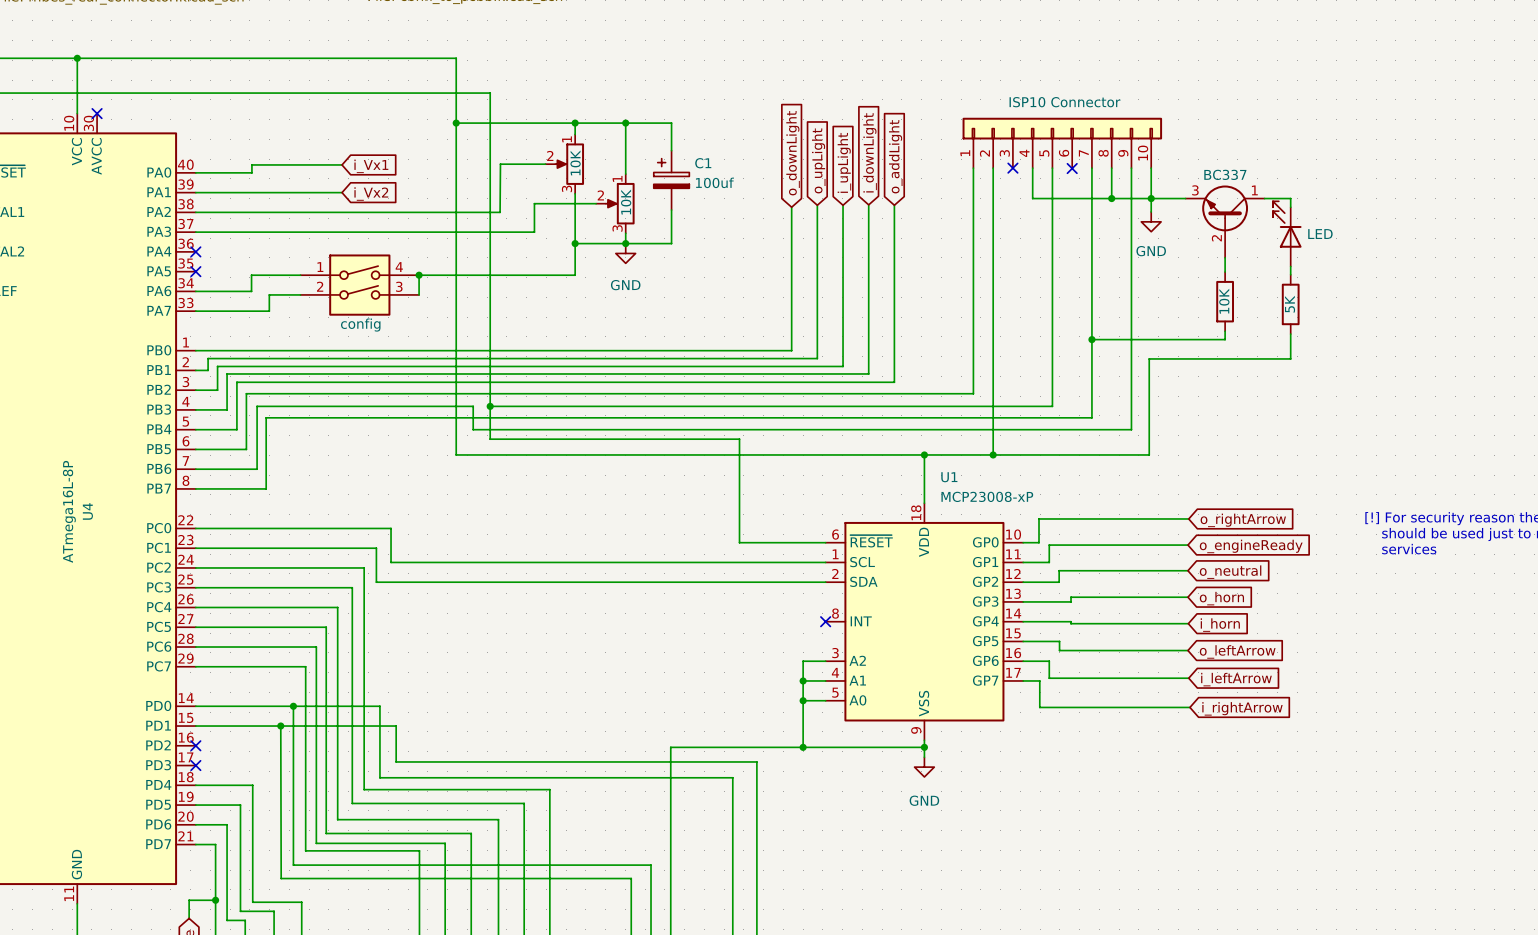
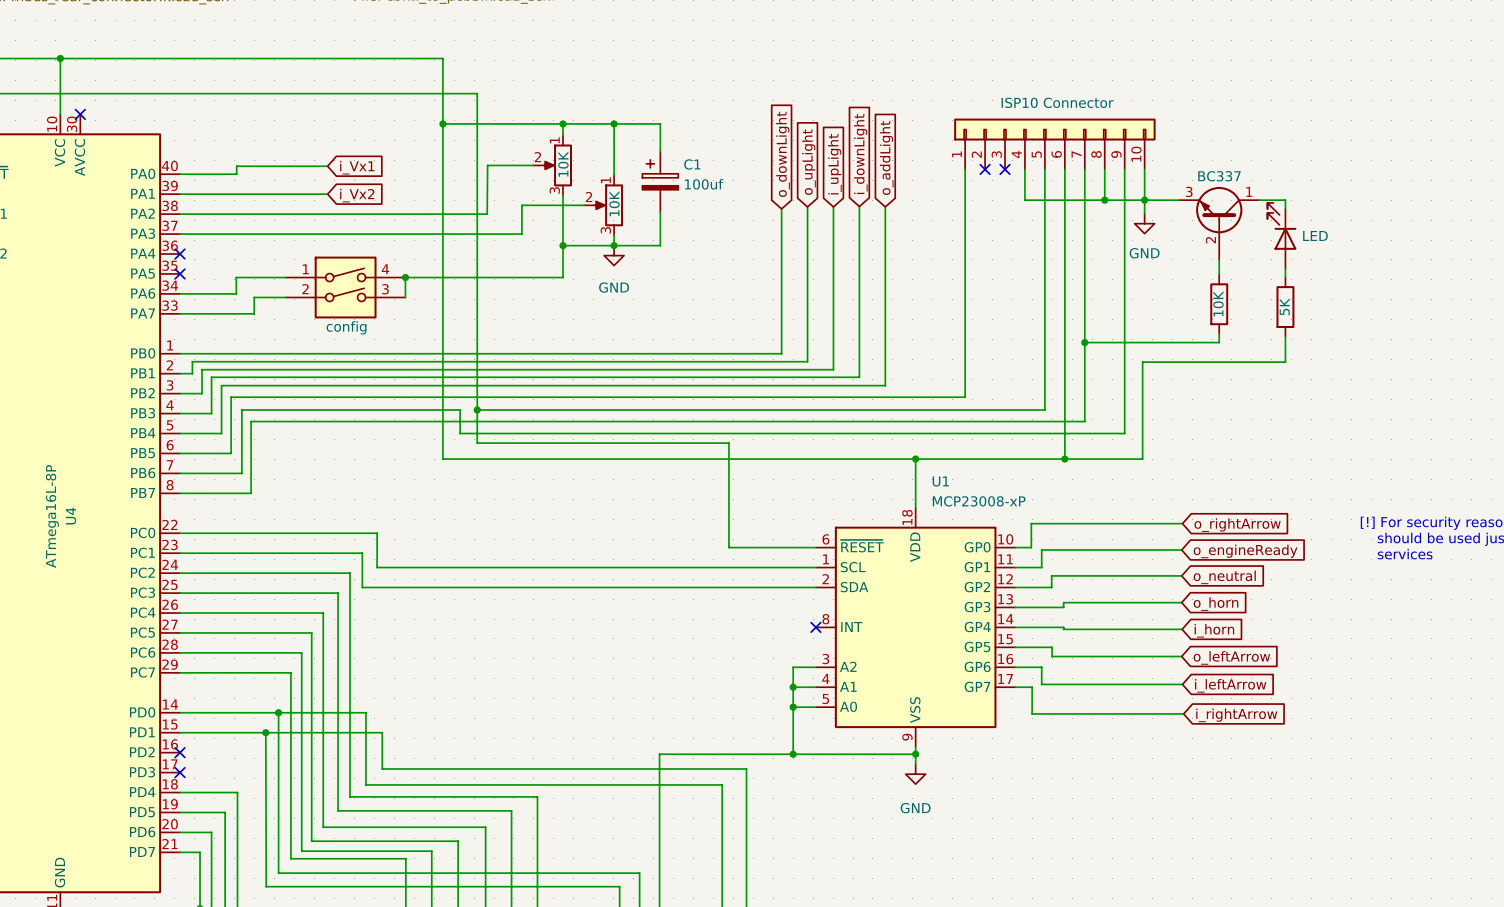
wire: (993, 168) (993, 454) -> (1064, 169) (1064, 459)
no-connect mark: none -> (985, 169)
no-connect mark: (1072, 168) -> none
junction: (993, 454) -> none
junction: none -> (1064, 459)

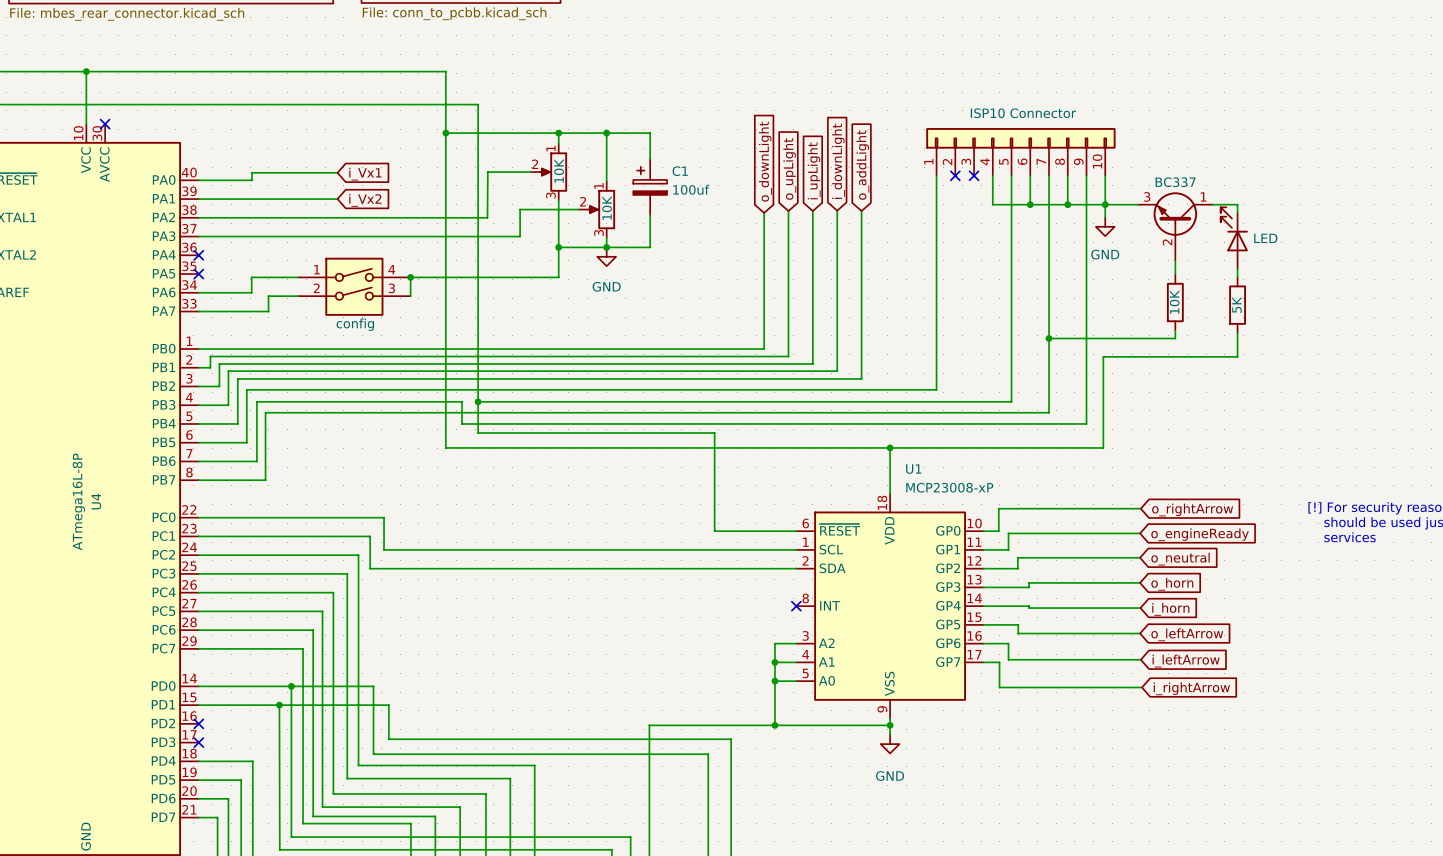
wire: (1064, 200) (1064, 459) -> none
junction: none -> (1030, 204)
junction: (1064, 459) -> none

